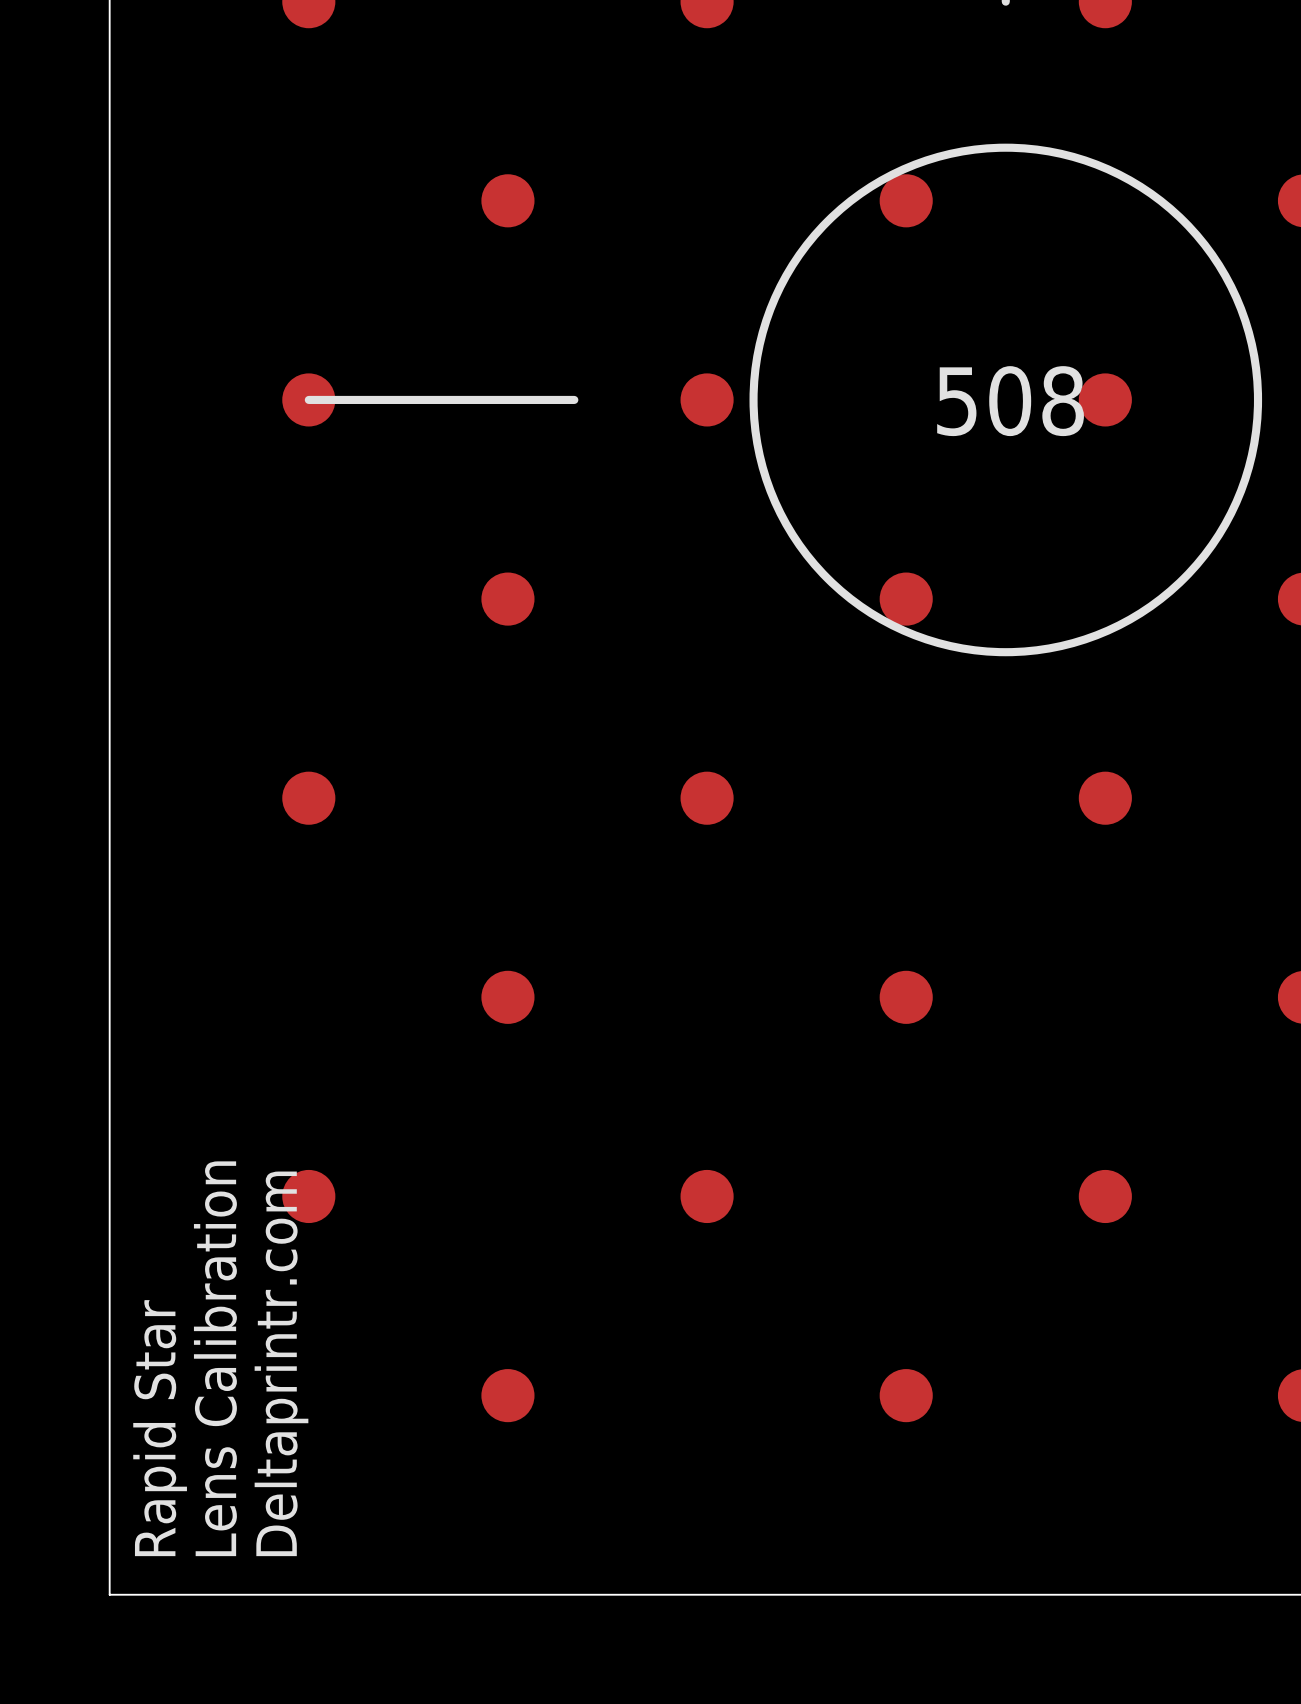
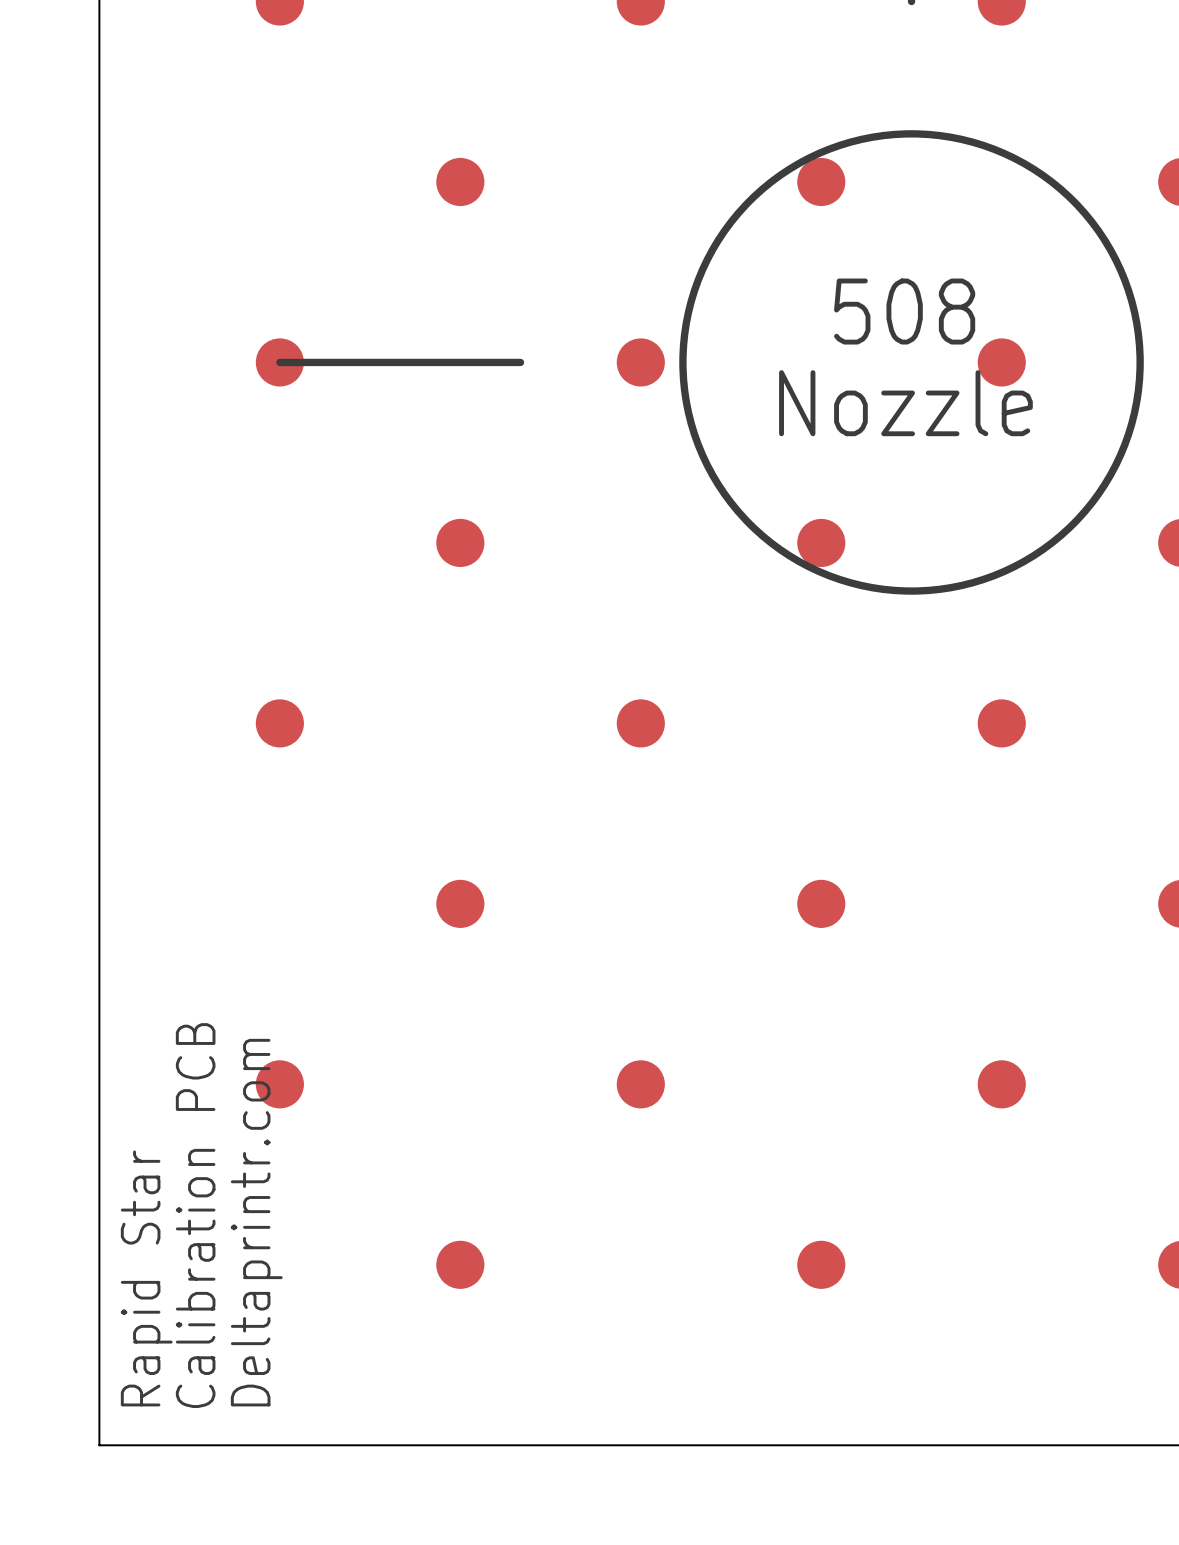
text position: 508 (1010, 401) -> 508 (904, 311)
text: none -> Nozzle (905, 403)
text: Lens Calibration (215, 1358) -> Calibration PCB (195, 1215)

